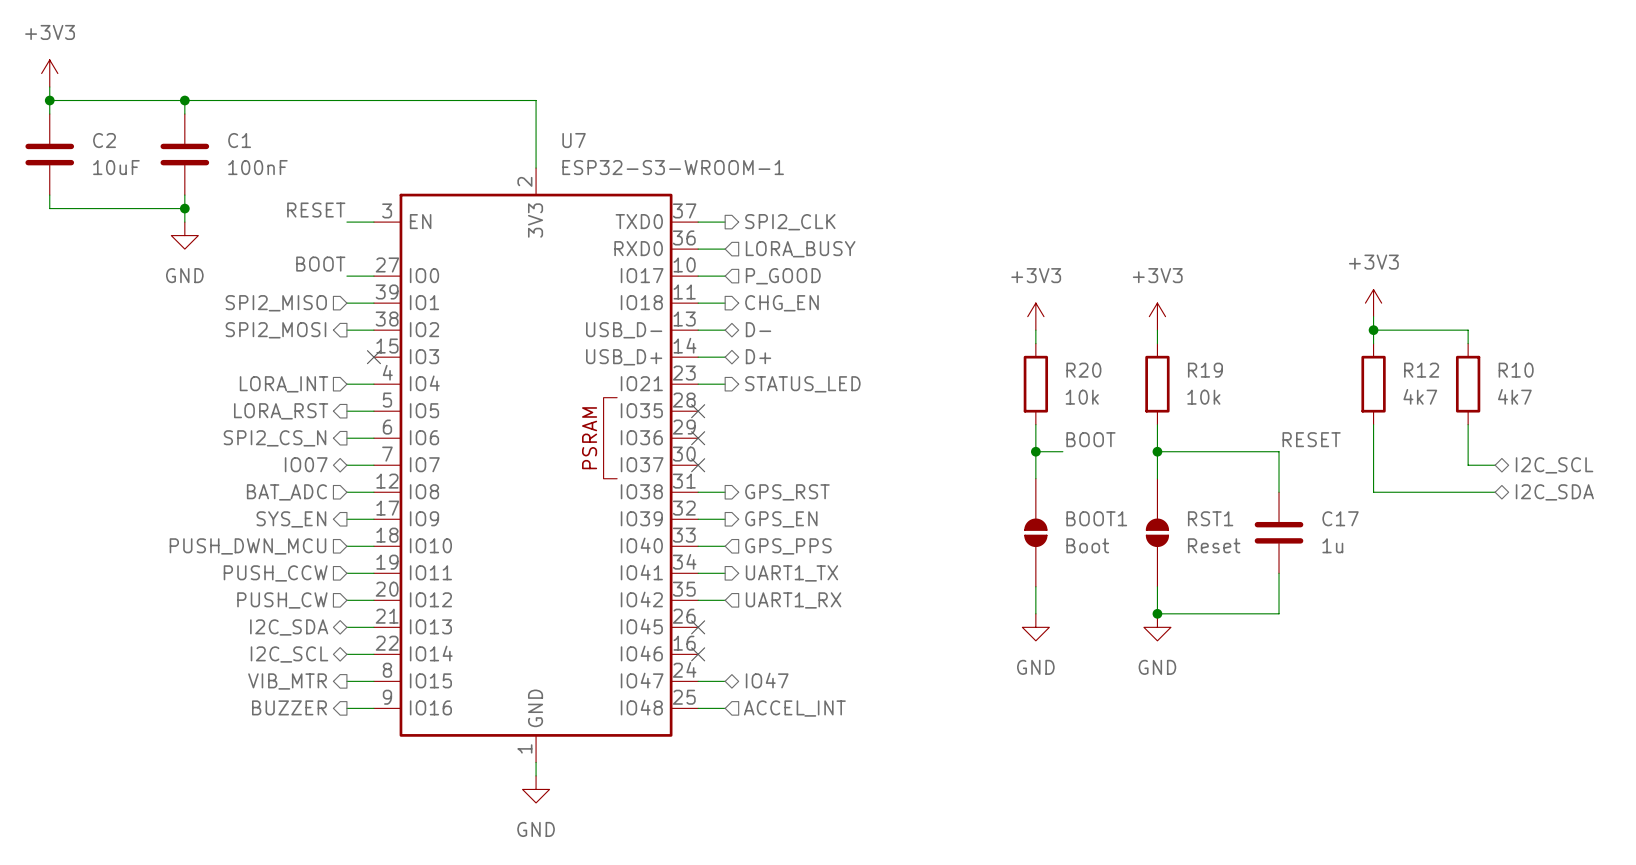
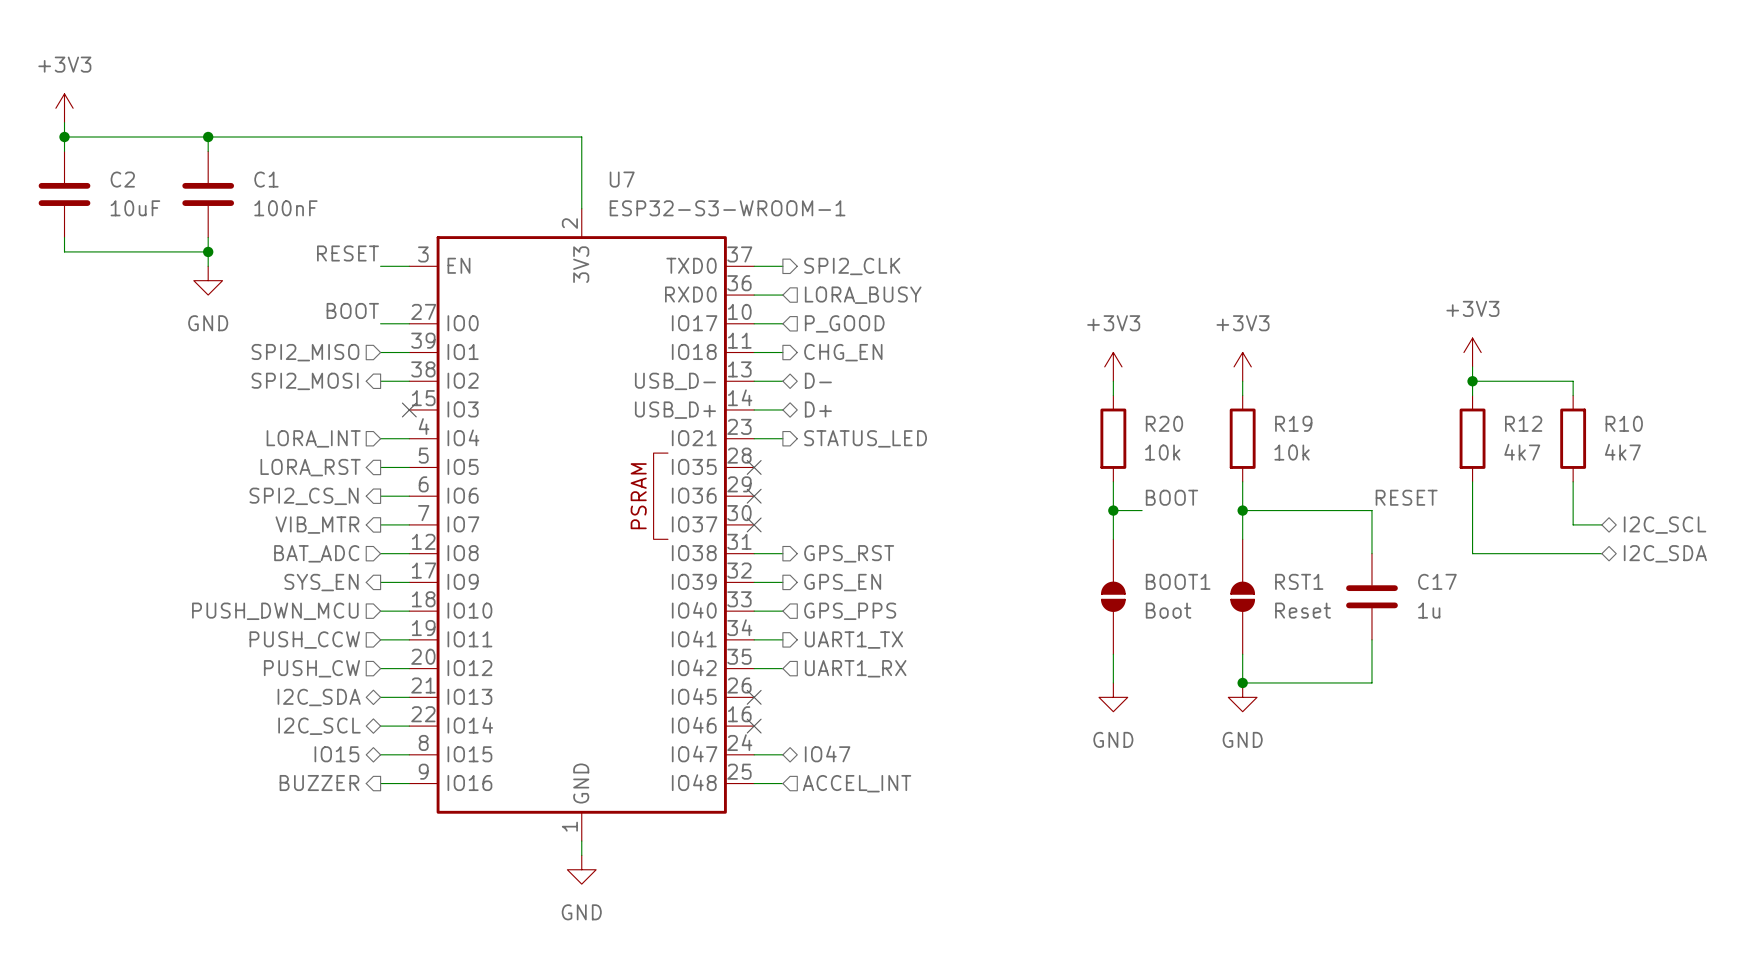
hierarchical label shape: bidirectional (306, 464) -> output (317, 525)
hierarchical label: IO07 (306, 464) -> VIB_MTR (317, 525)
hierarchical label shape: output (287, 681) -> bidirectional (336, 754)
hierarchical label: VIB_MTR (287, 681) -> IO15 (336, 754)

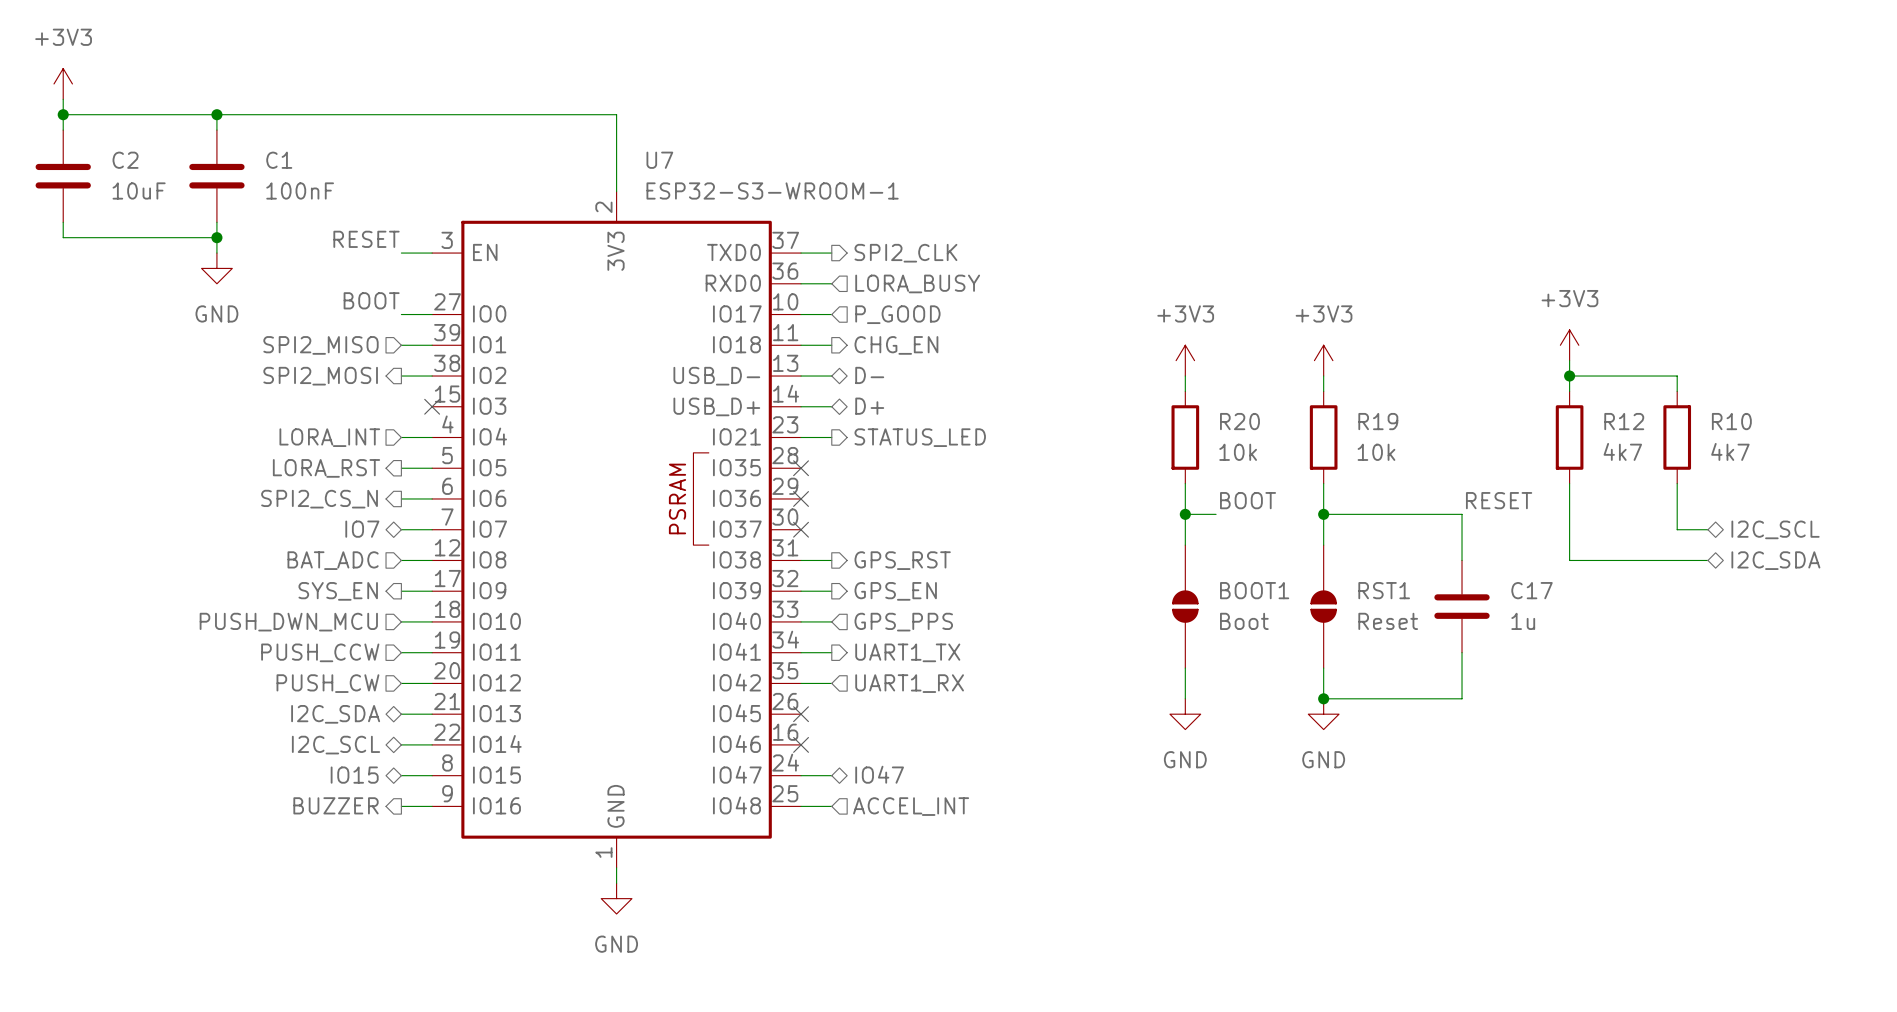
hierarchical label shape: output (317, 525) -> bidirectional (362, 529)
hierarchical label: VIB_MTR (317, 525) -> IO7 (362, 529)

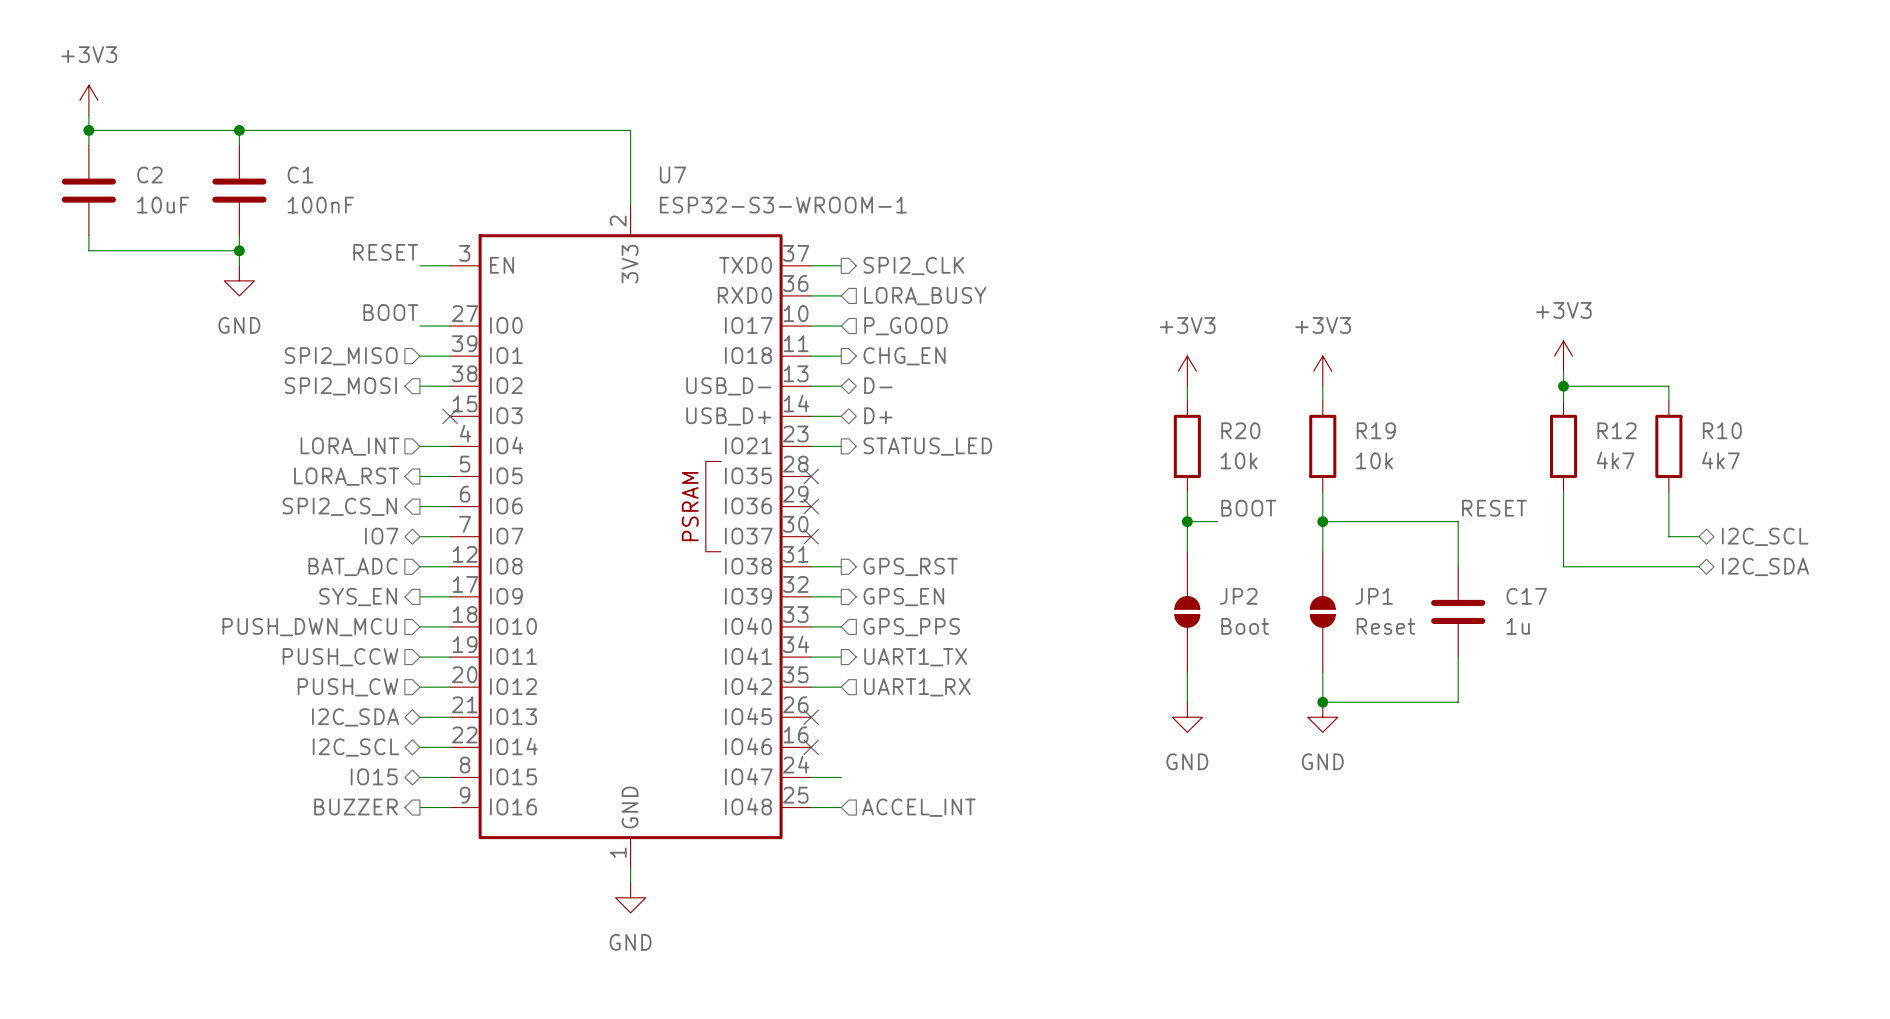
BOOT1 name: BOOT1 (1254, 590) -> JP2 (1238, 596)
RST1 name: RST1 (1384, 590) -> JP1 (1374, 596)
hierarchical label: IO47 (879, 774) -> none

